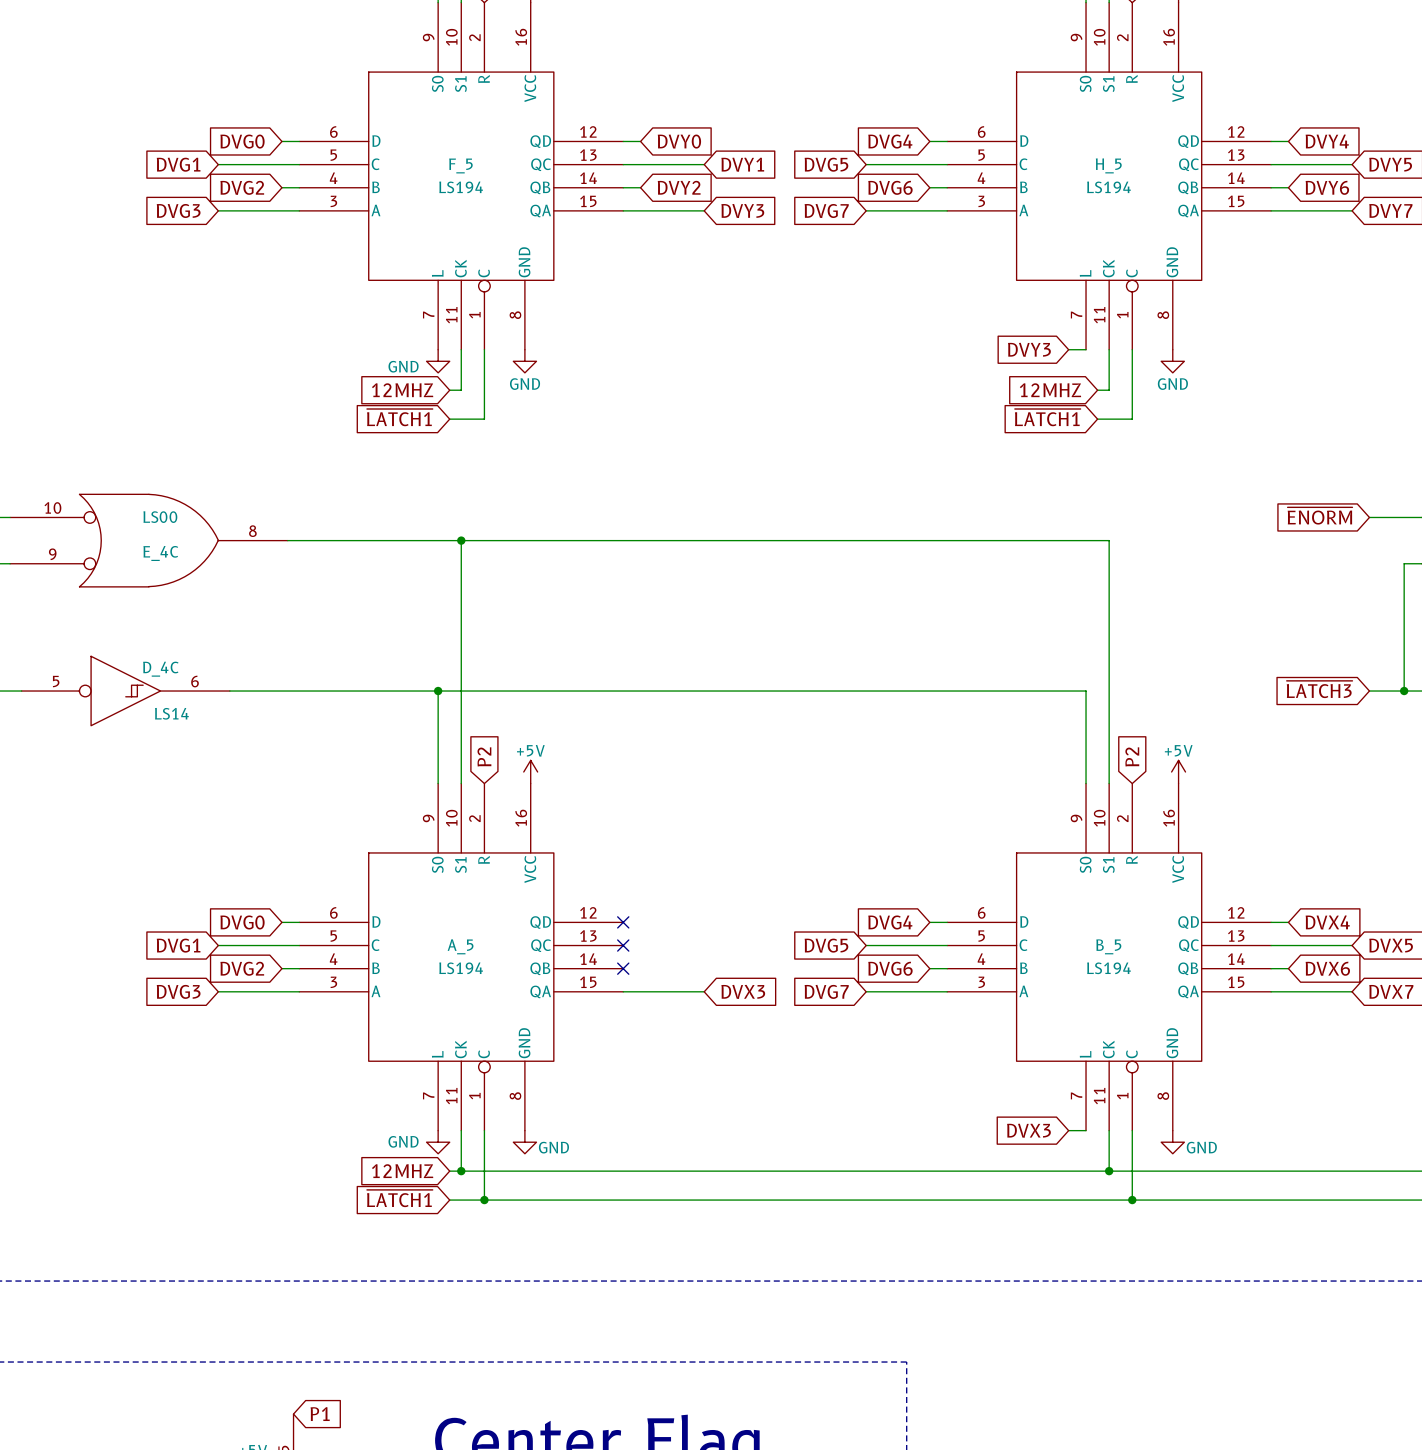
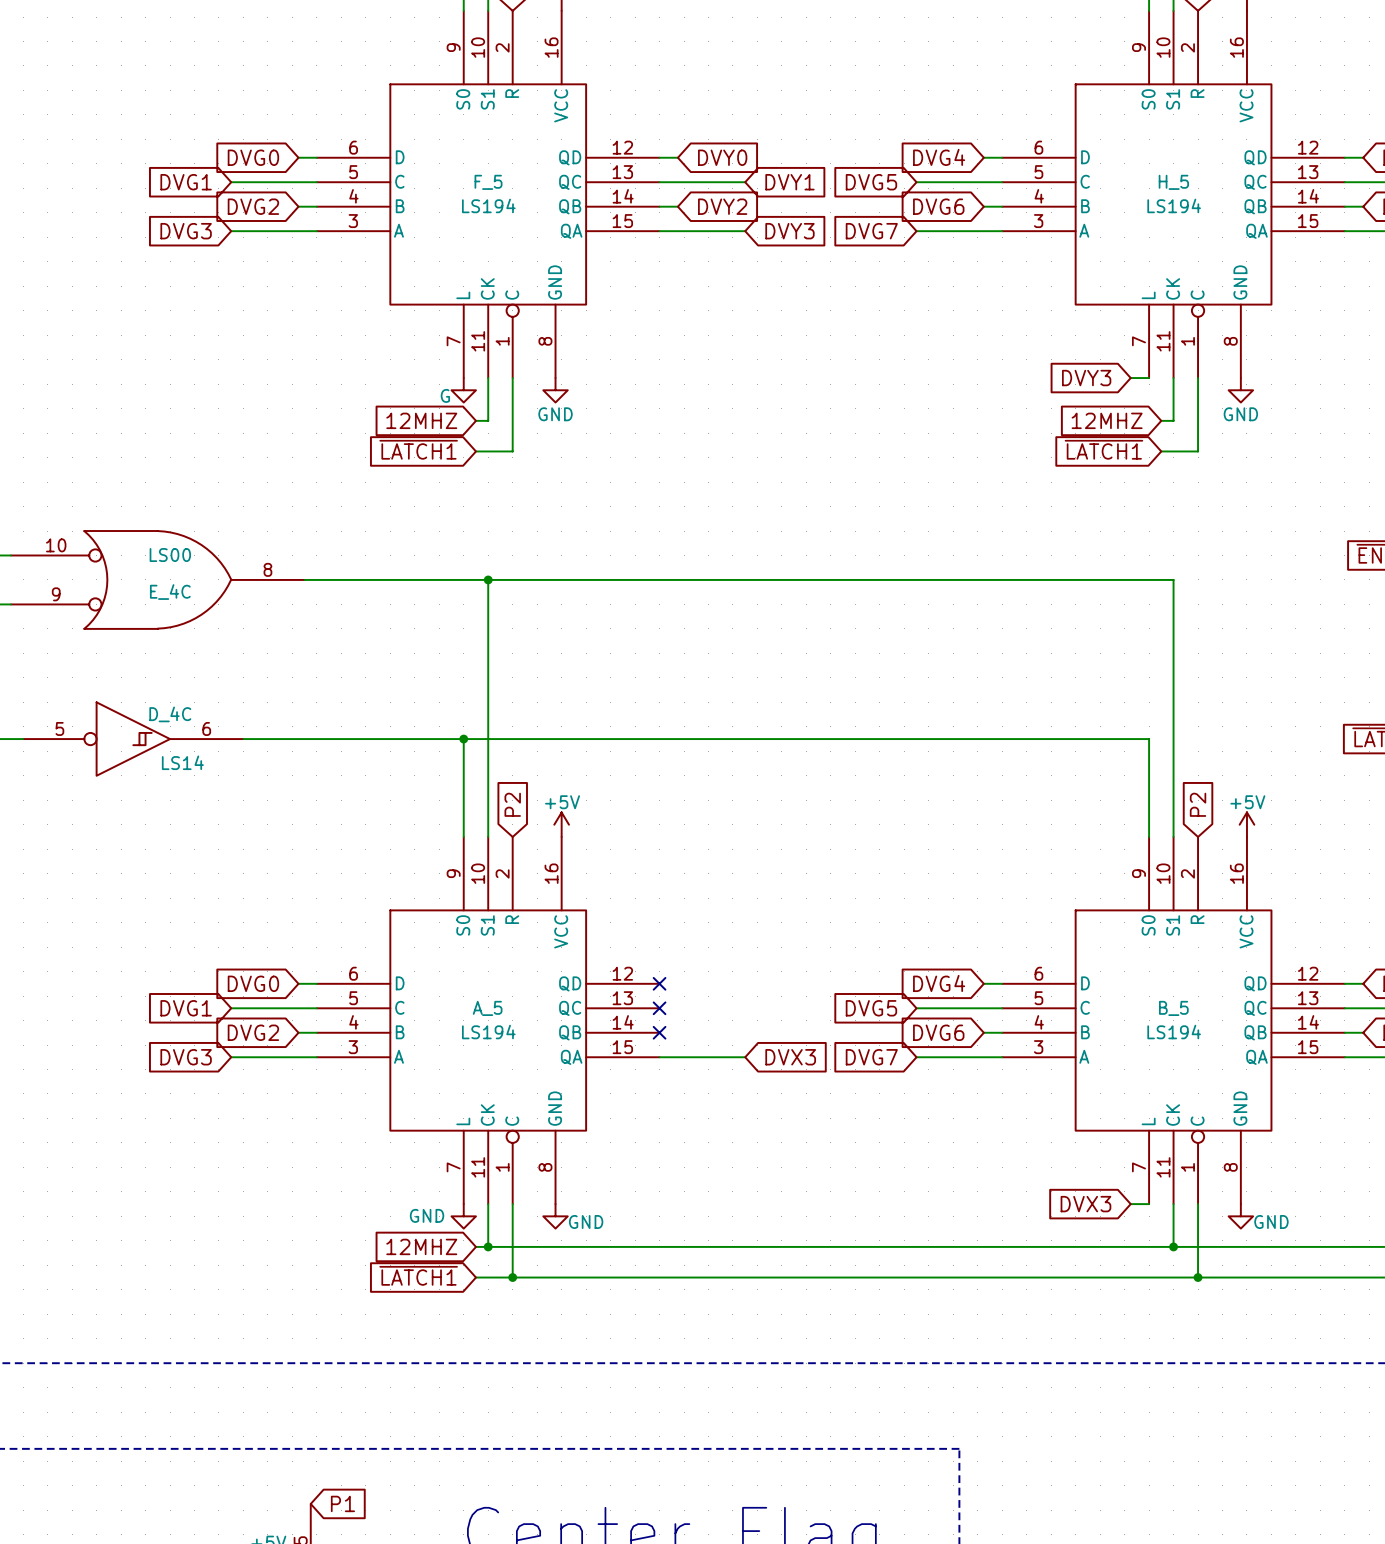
power symbol: GND (438, 361) -> G (463, 390)

